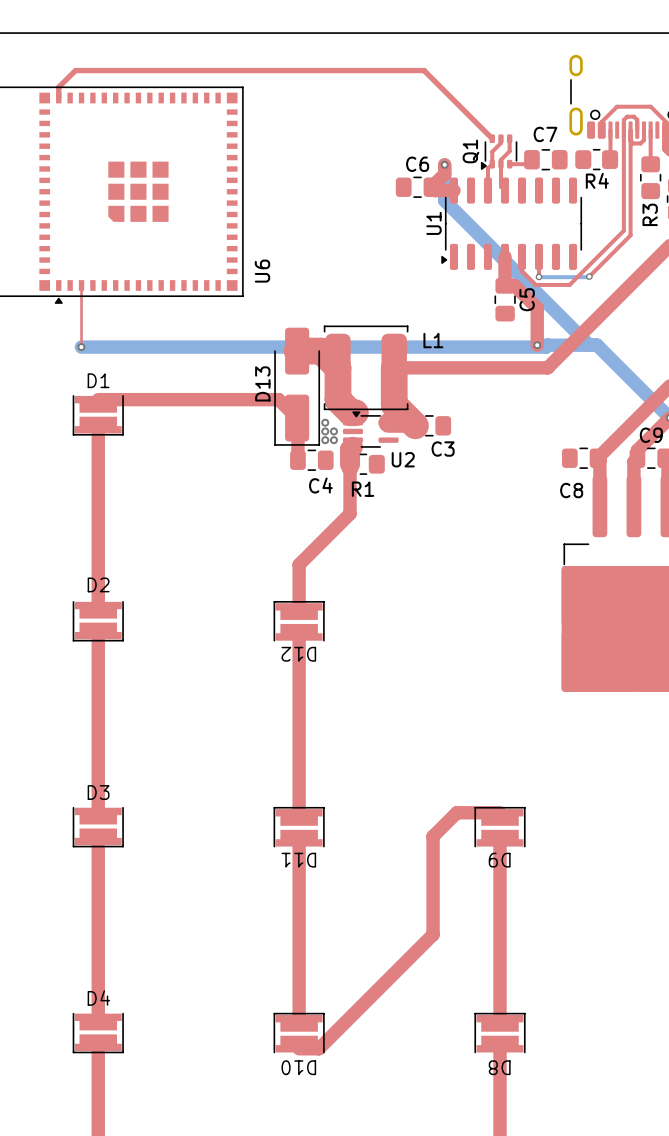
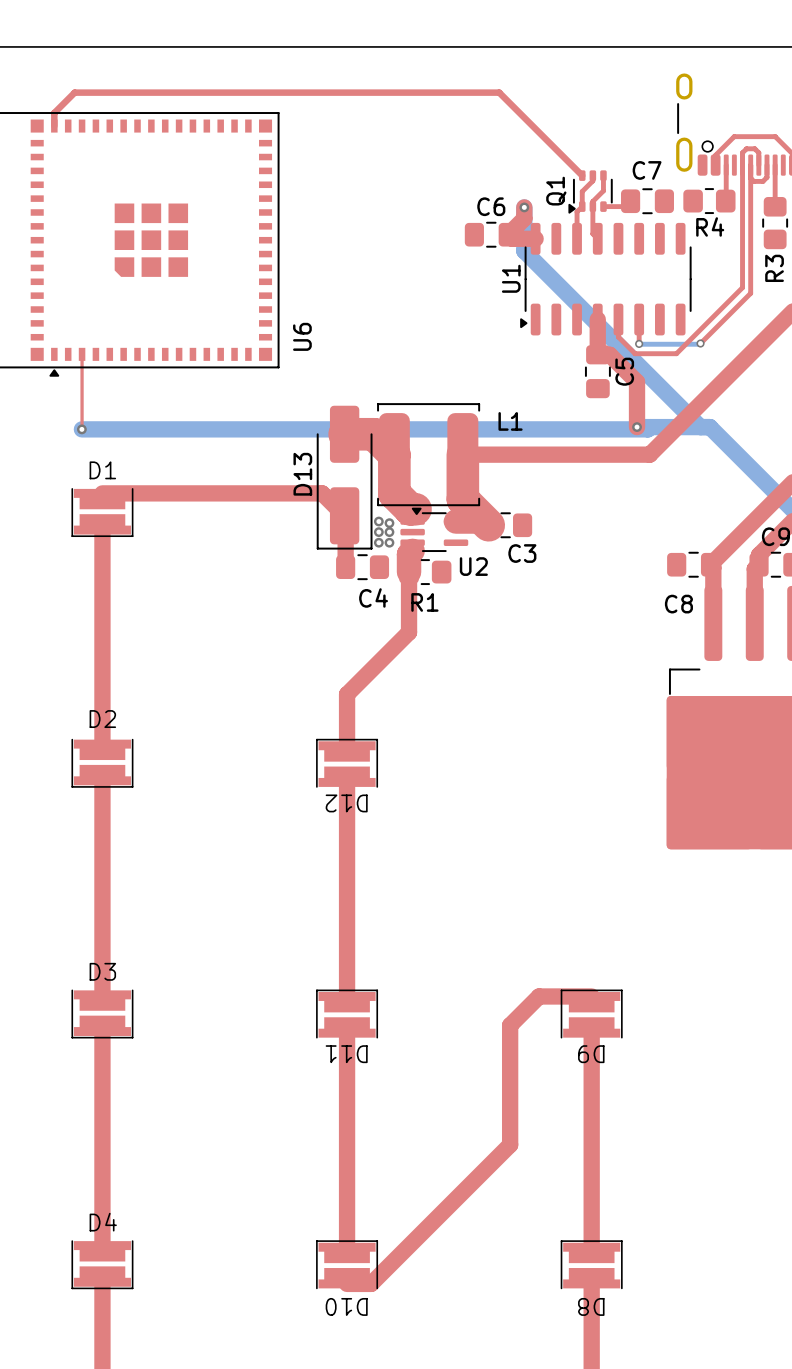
via: none -> (389, 523)

